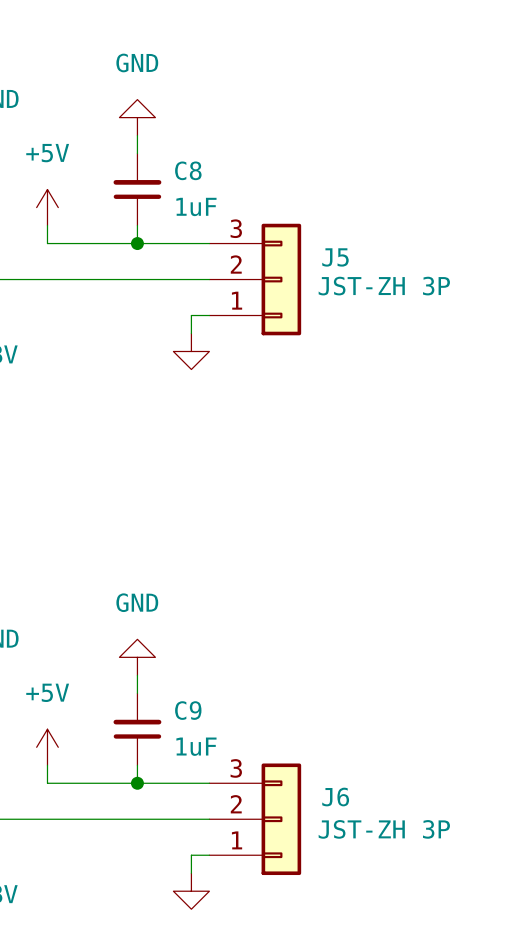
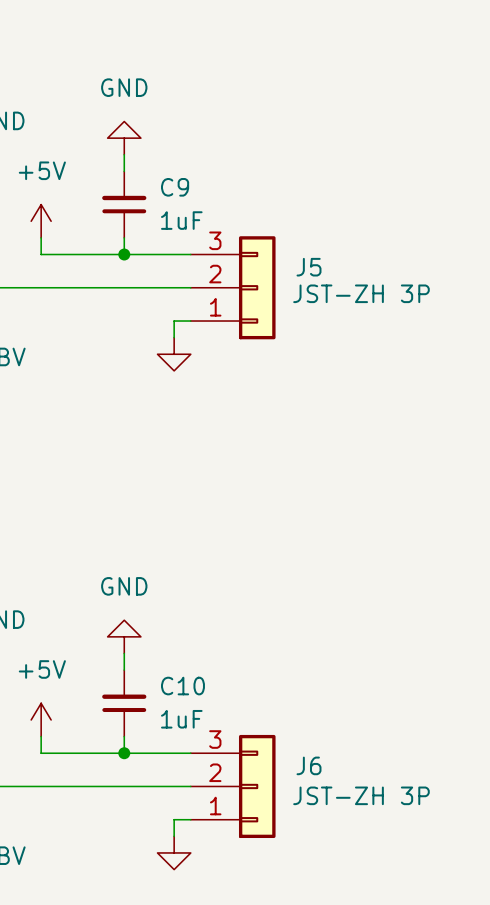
C8 name: C8 (188, 170) -> C9 (175, 187)
C9 name: C9 (188, 710) -> C10 (182, 686)

